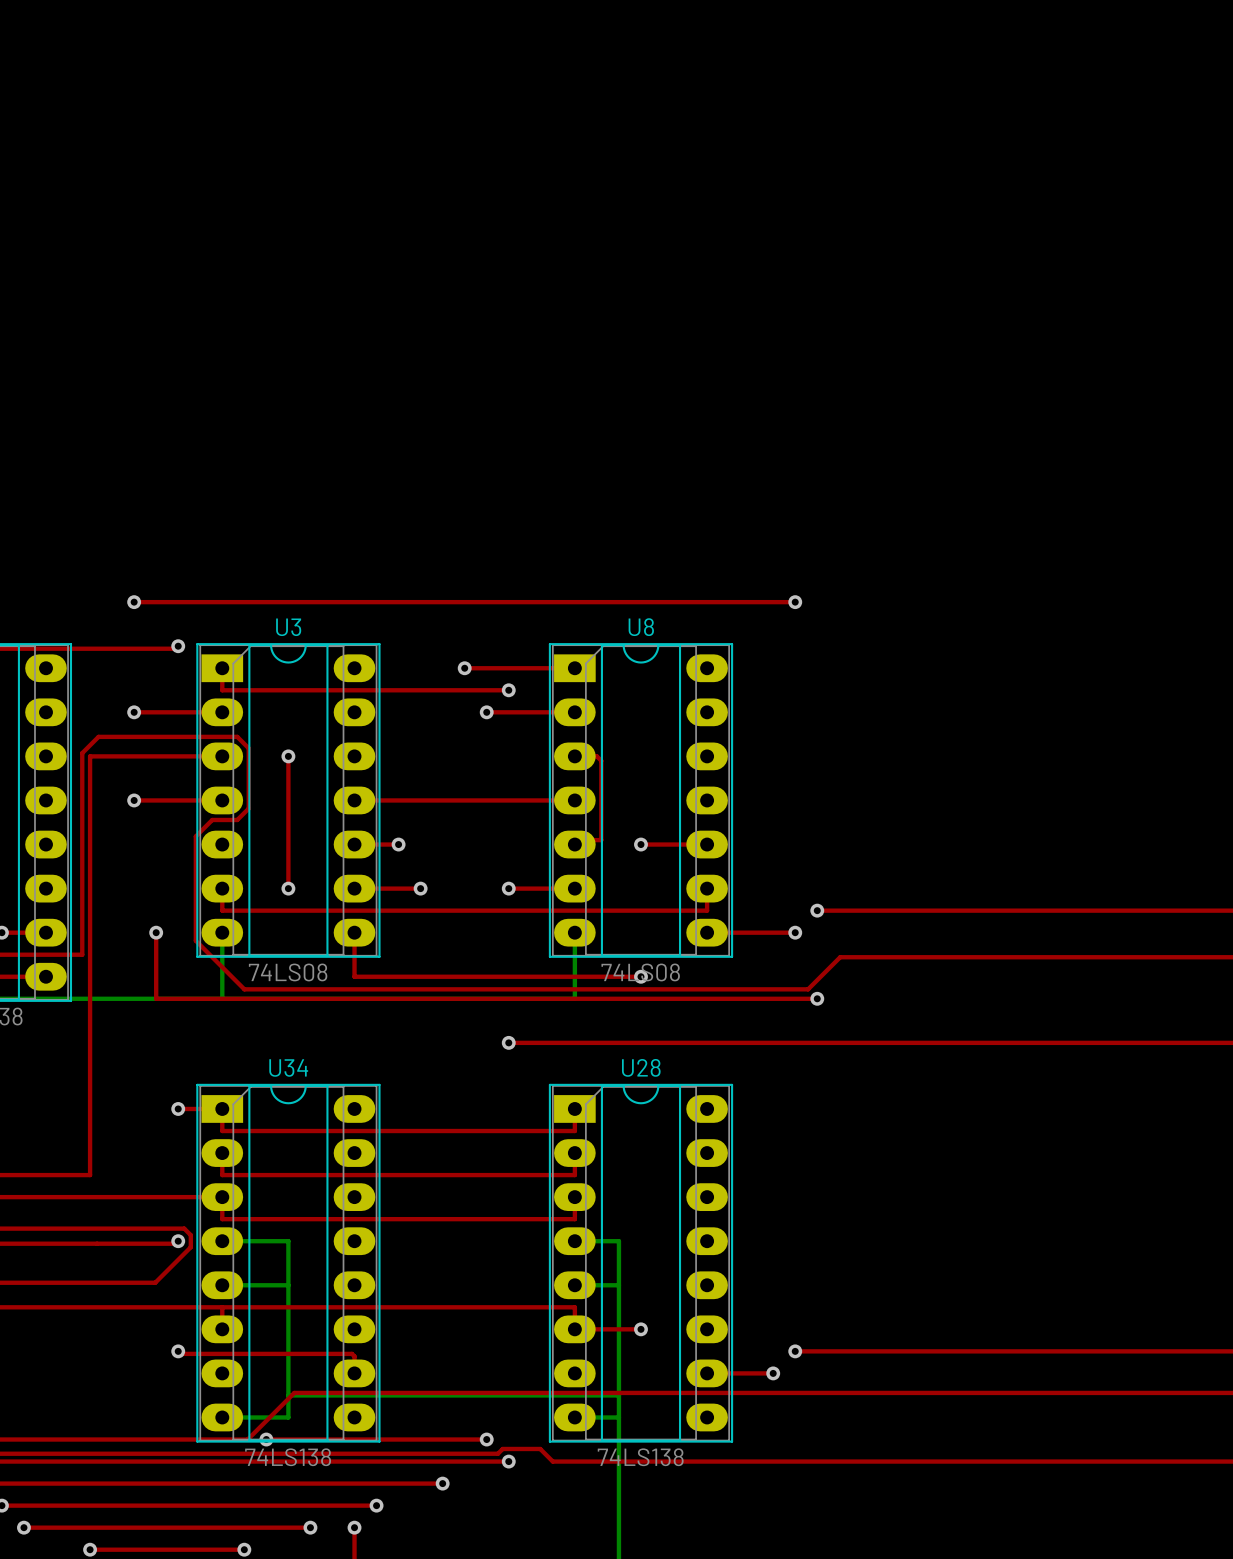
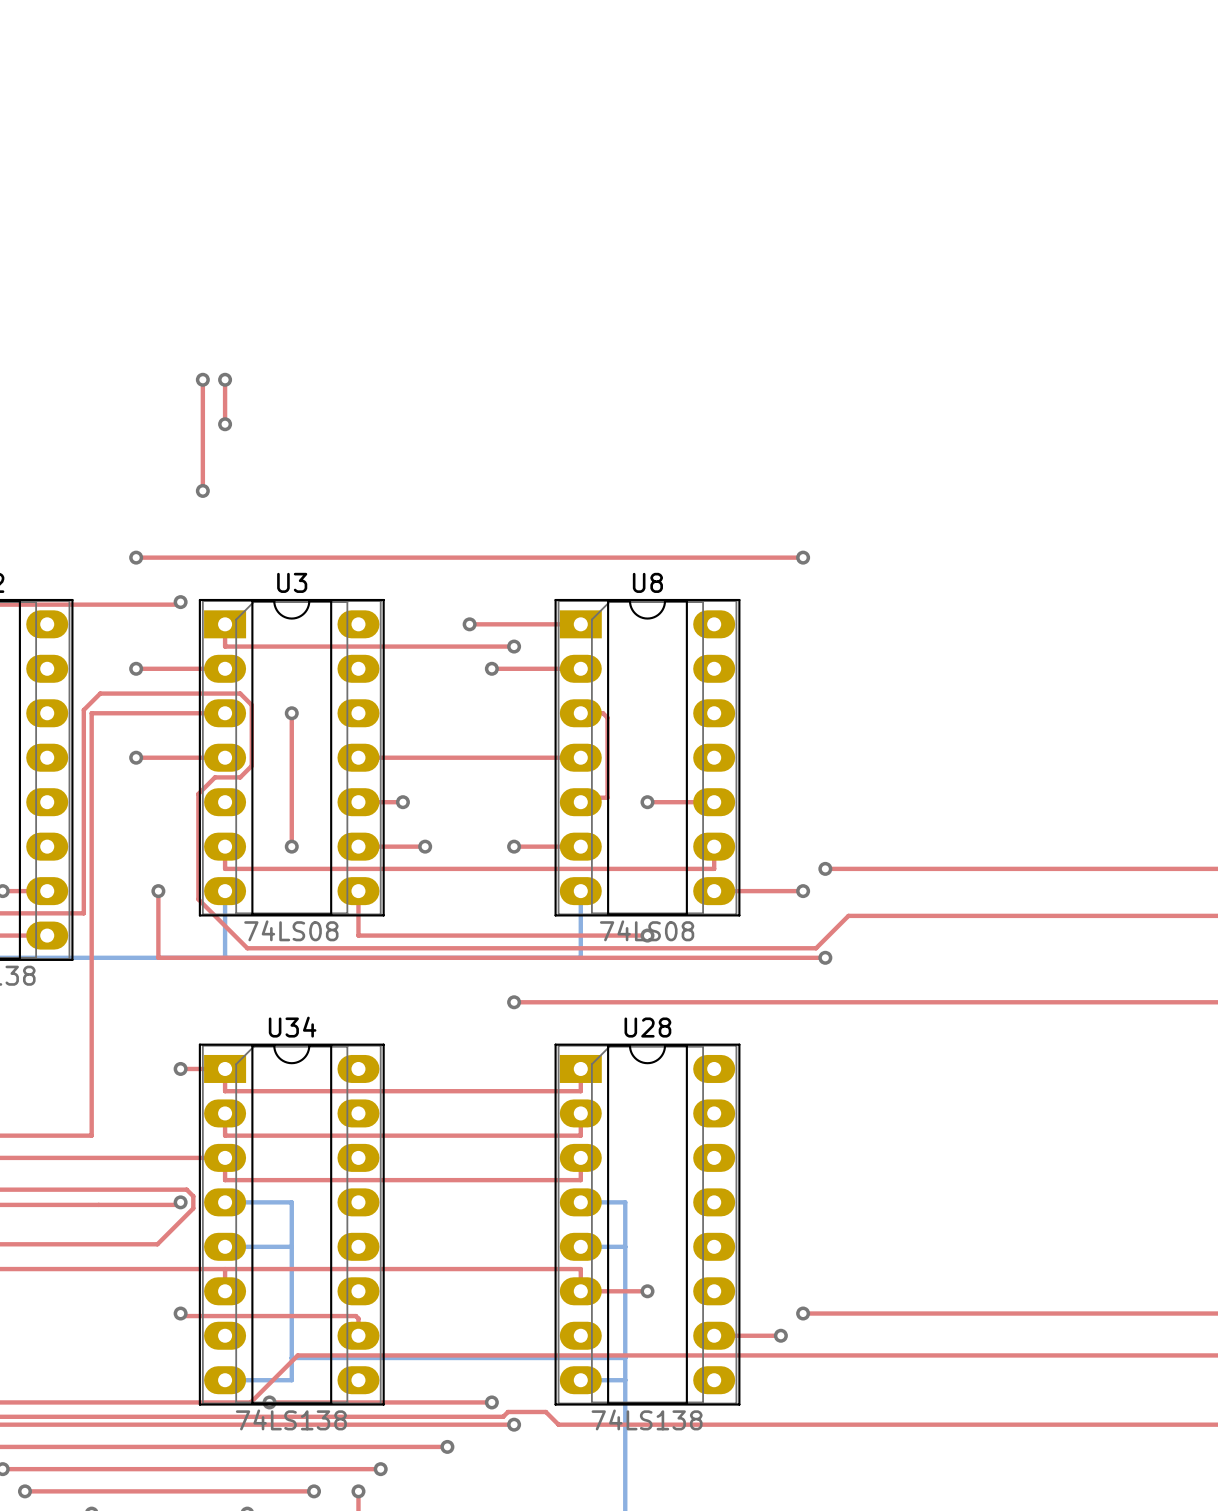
top track: none -> (202, 379) (202, 490)
via: none -> (202, 379)
top track: none -> (225, 379) (225, 424)
via: none -> (225, 379)
via: none -> (225, 424)
via: none -> (202, 490)

